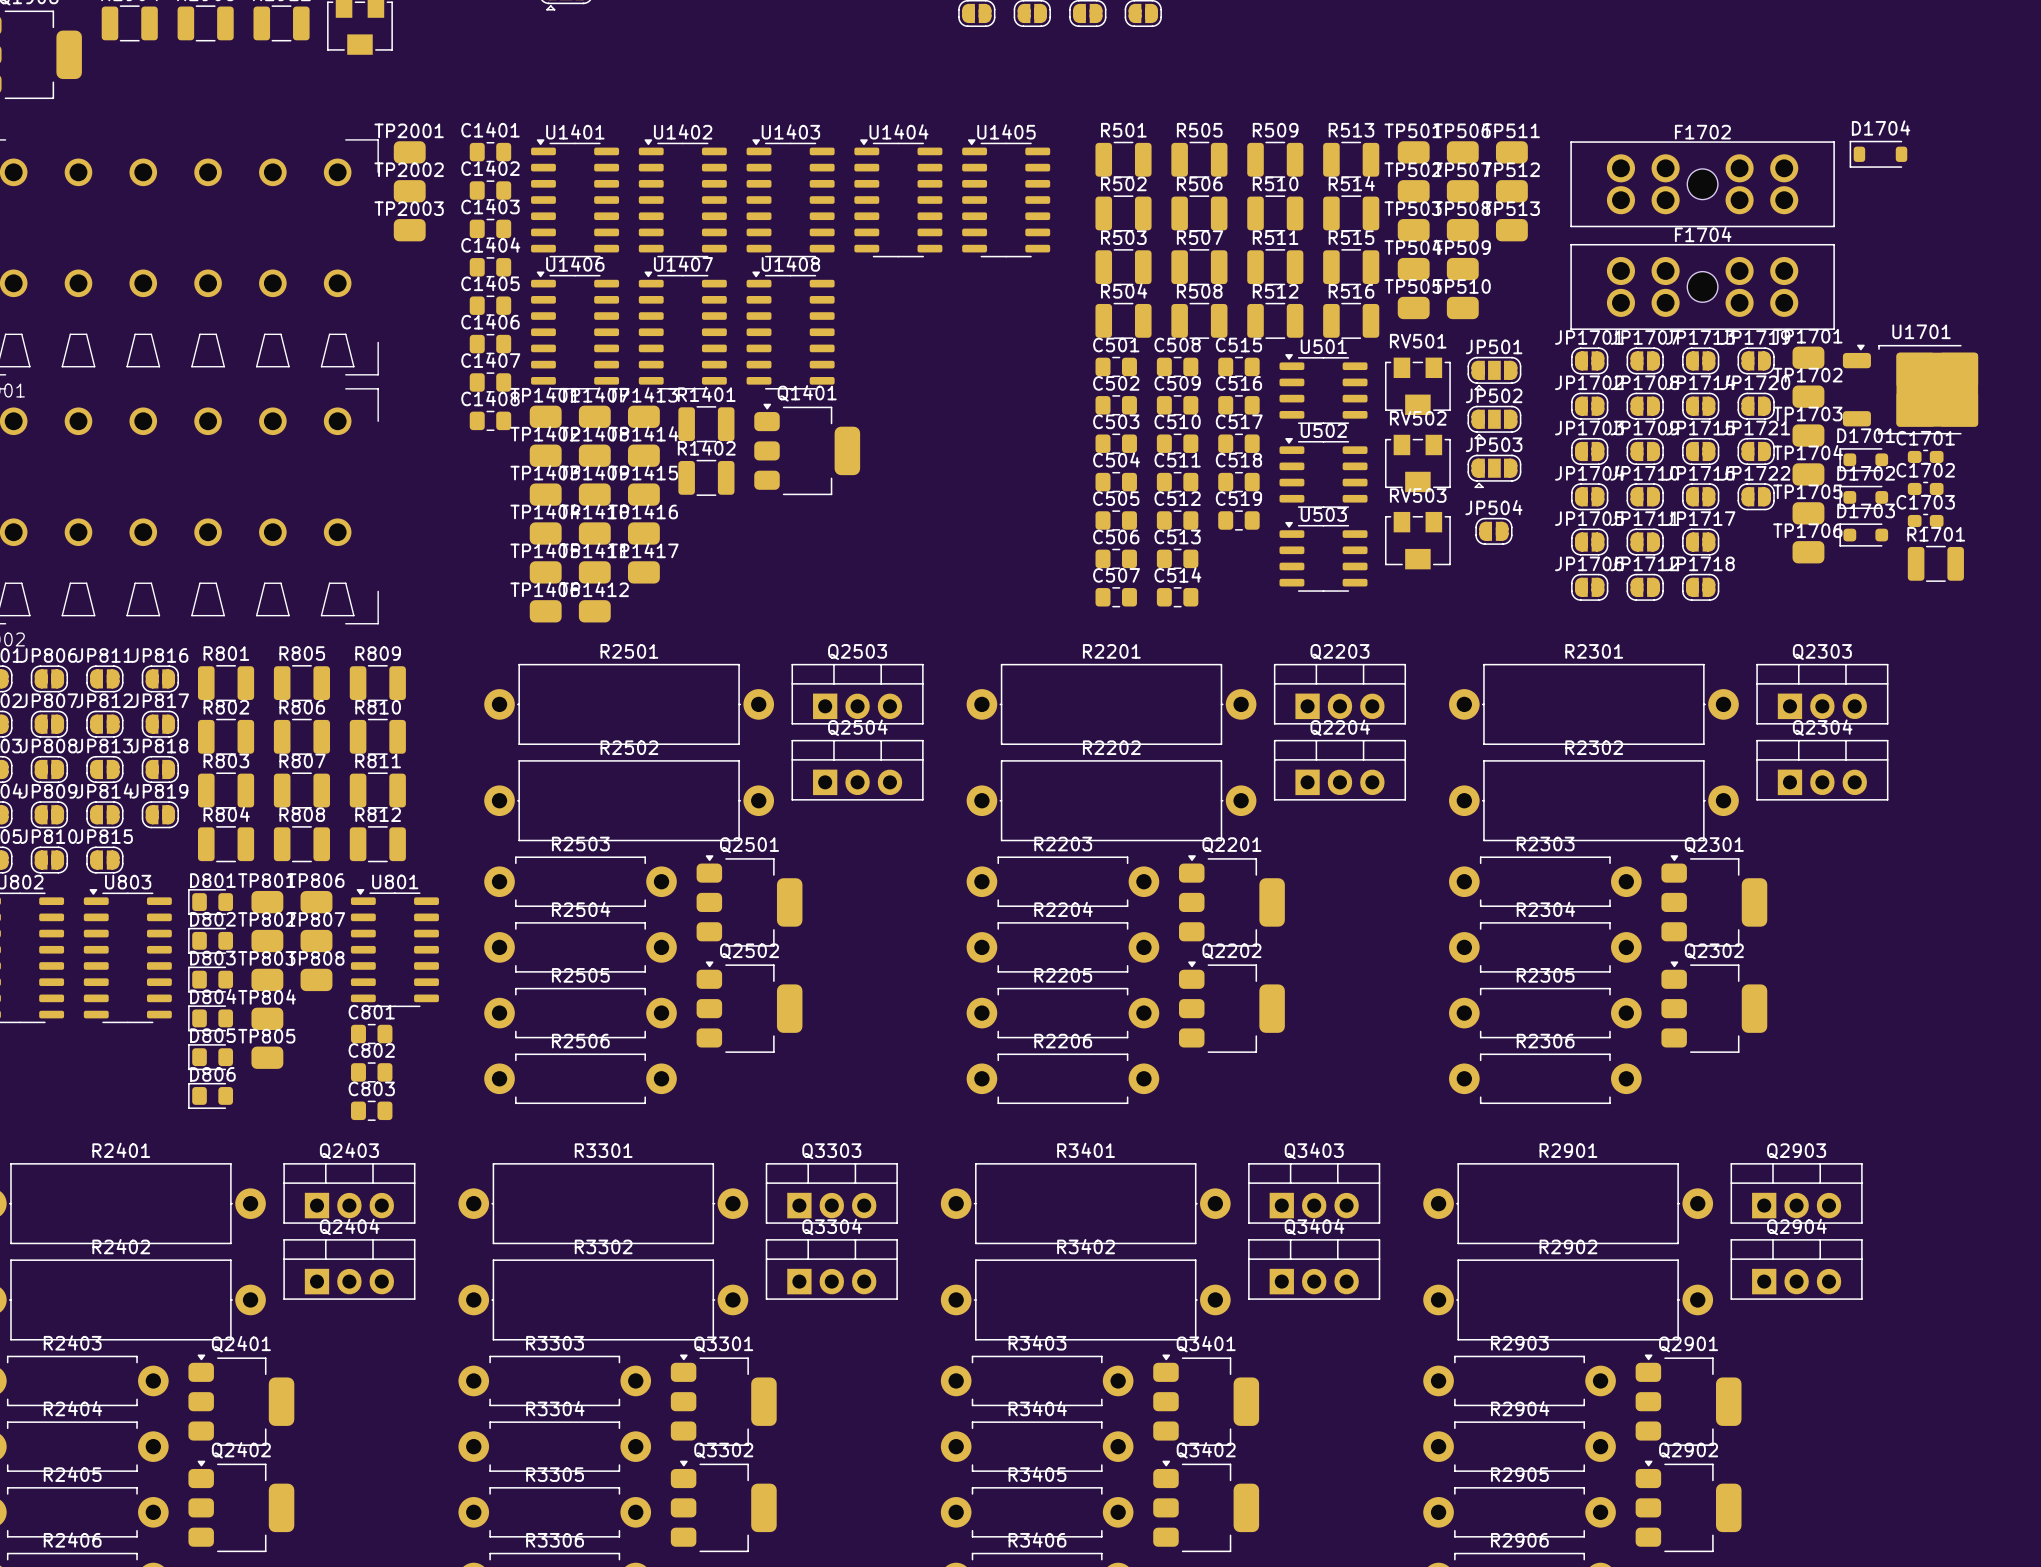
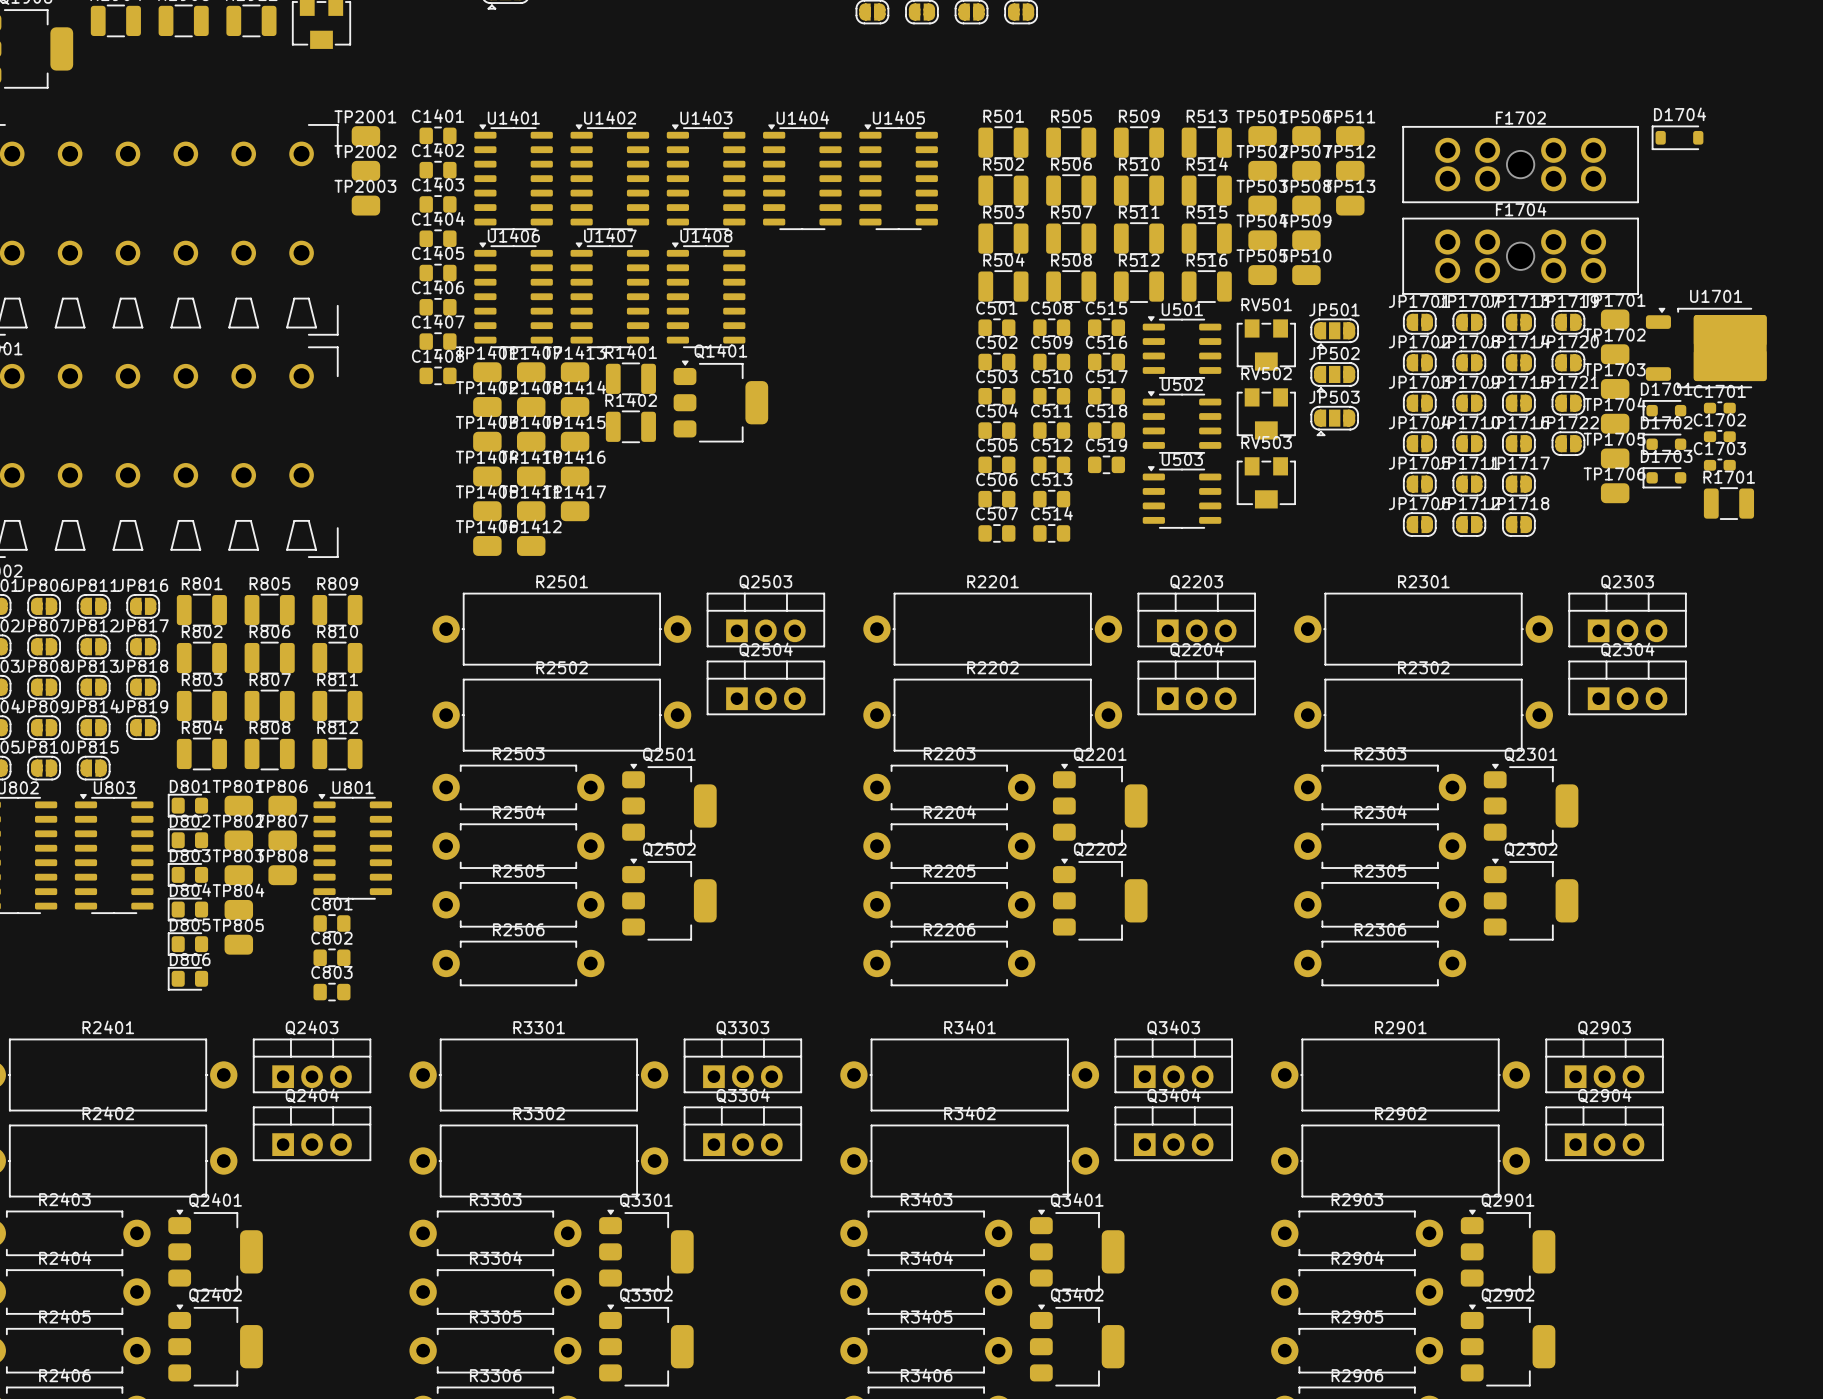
JP504: (1493, 531) -> none

